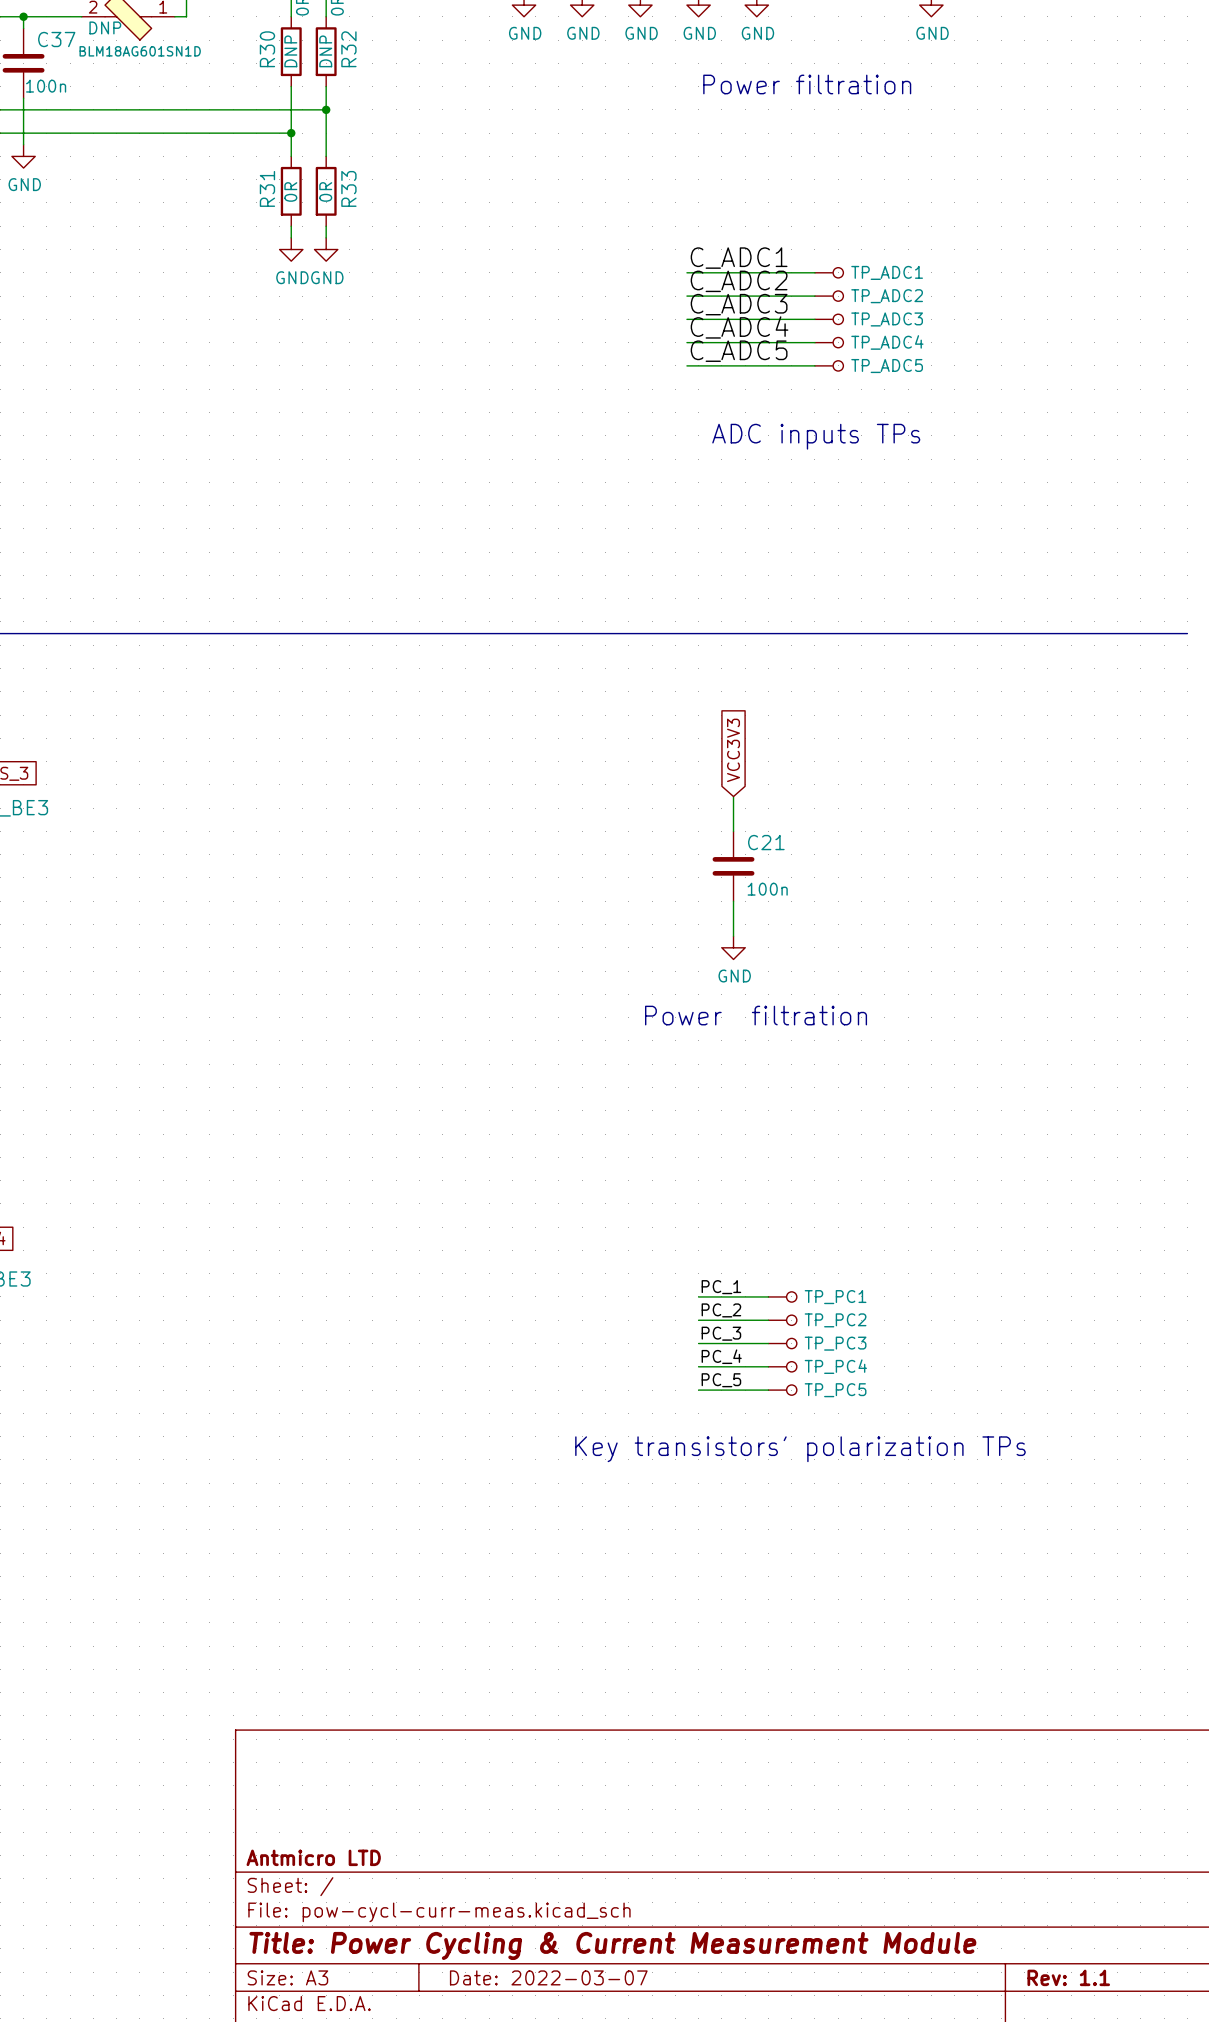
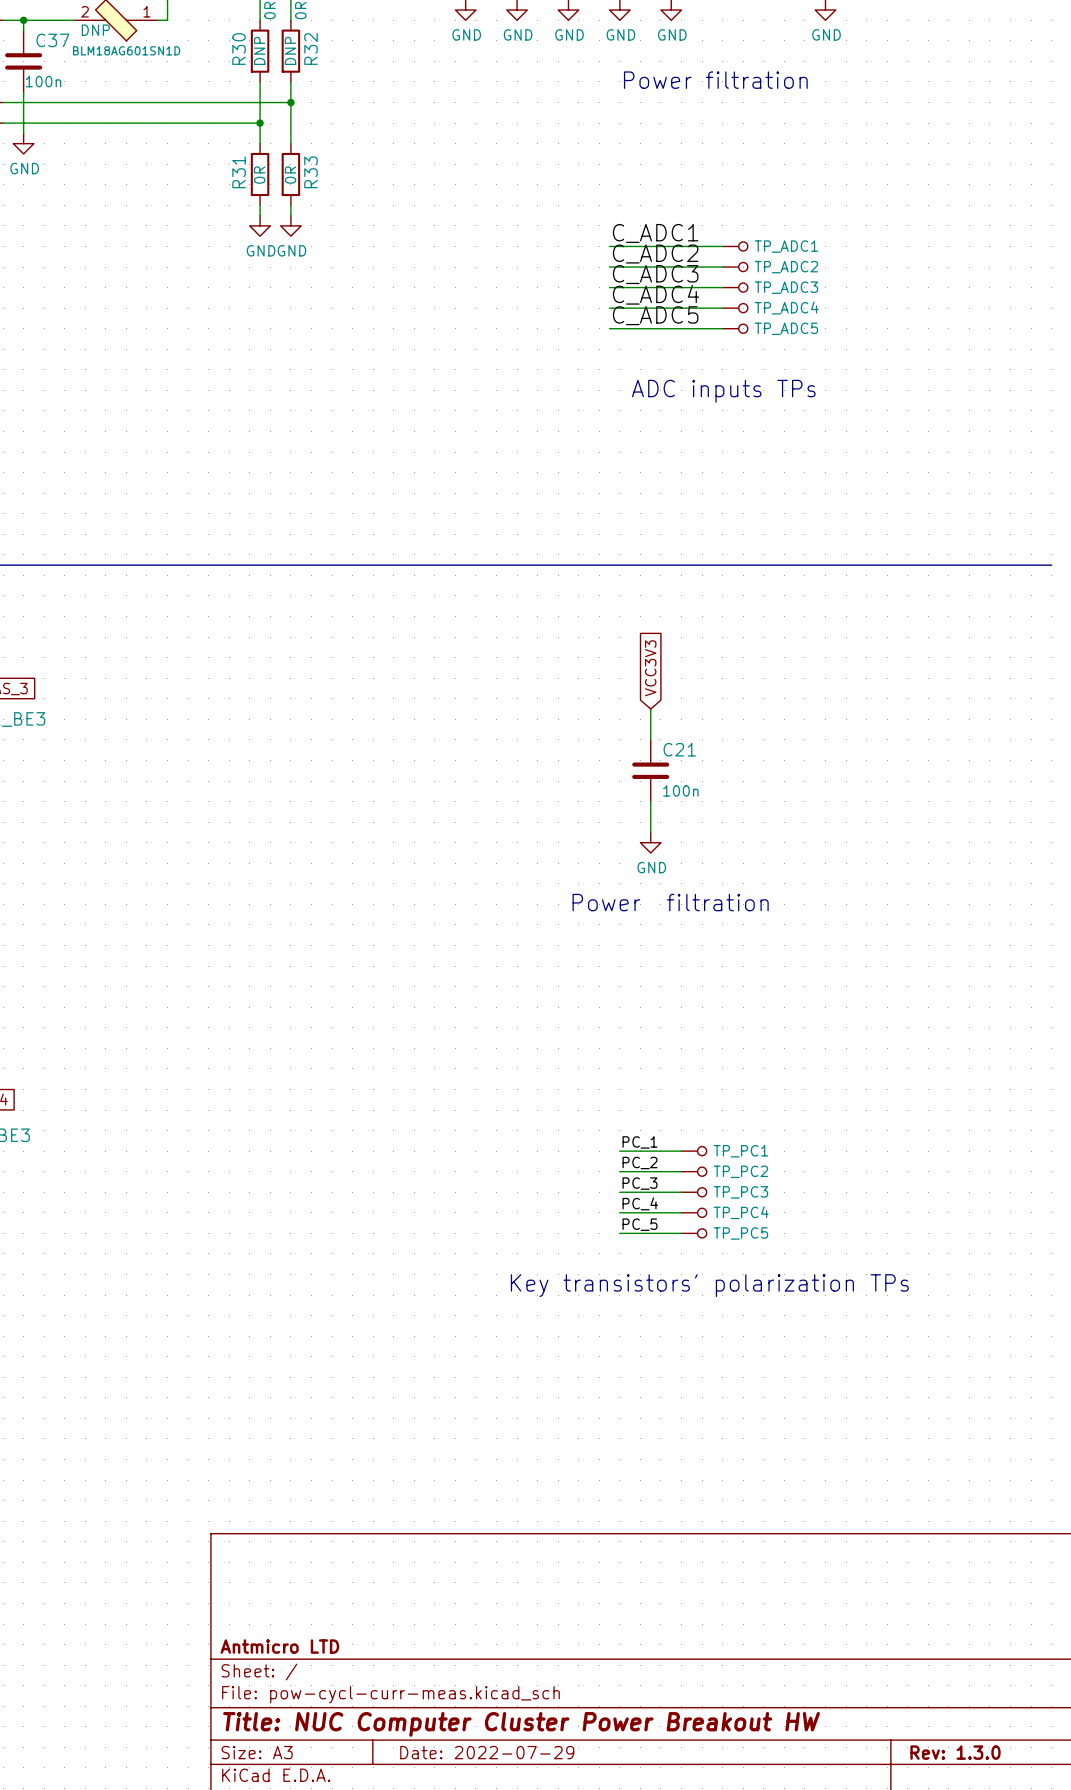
title block: Title: Power Cycling & Current Measurement Module (612, 1945) -> Title: NUC Computer Cluster Power Breakout HW (521, 1724)
title block: Date: 2022-03-07 (548, 1977) -> Date: 2022-07-29 (487, 1752)
title block: Rev: 1.1 (1068, 1977) -> Rev: 1.3.0 (955, 1752)

